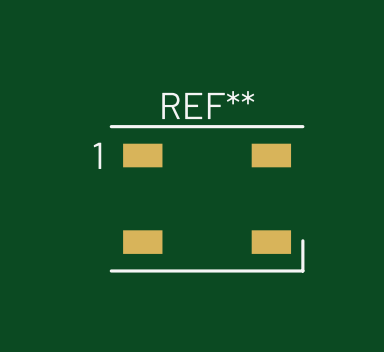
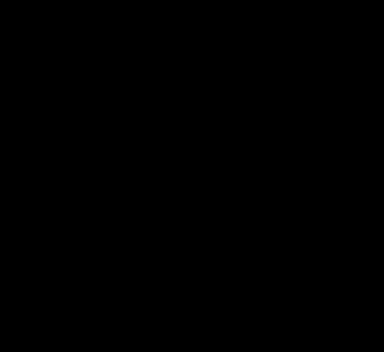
REF**: (207, 198) -> none

